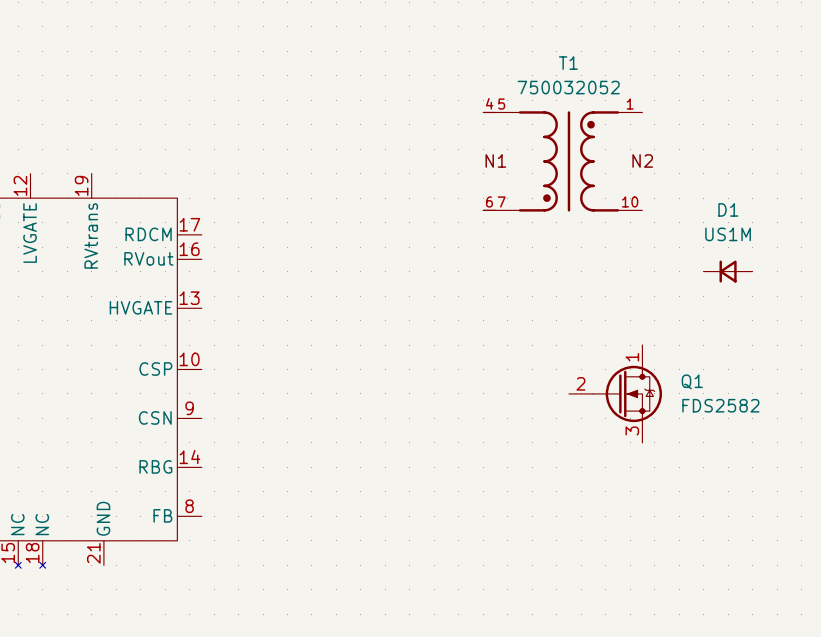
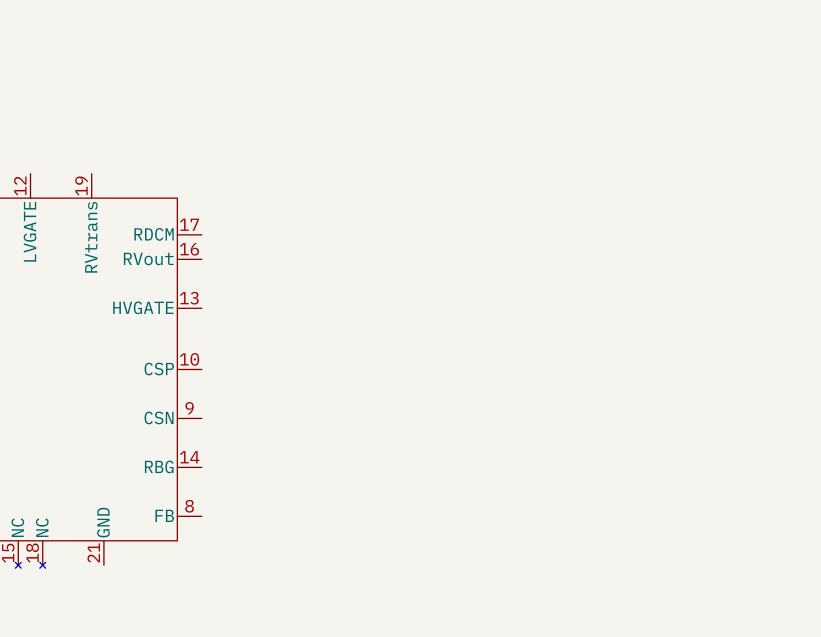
T1: 750032052 (562, 161) -> none
D1: US1M (728, 271) -> none
Q1: FDS2582 (615, 393) -> none

